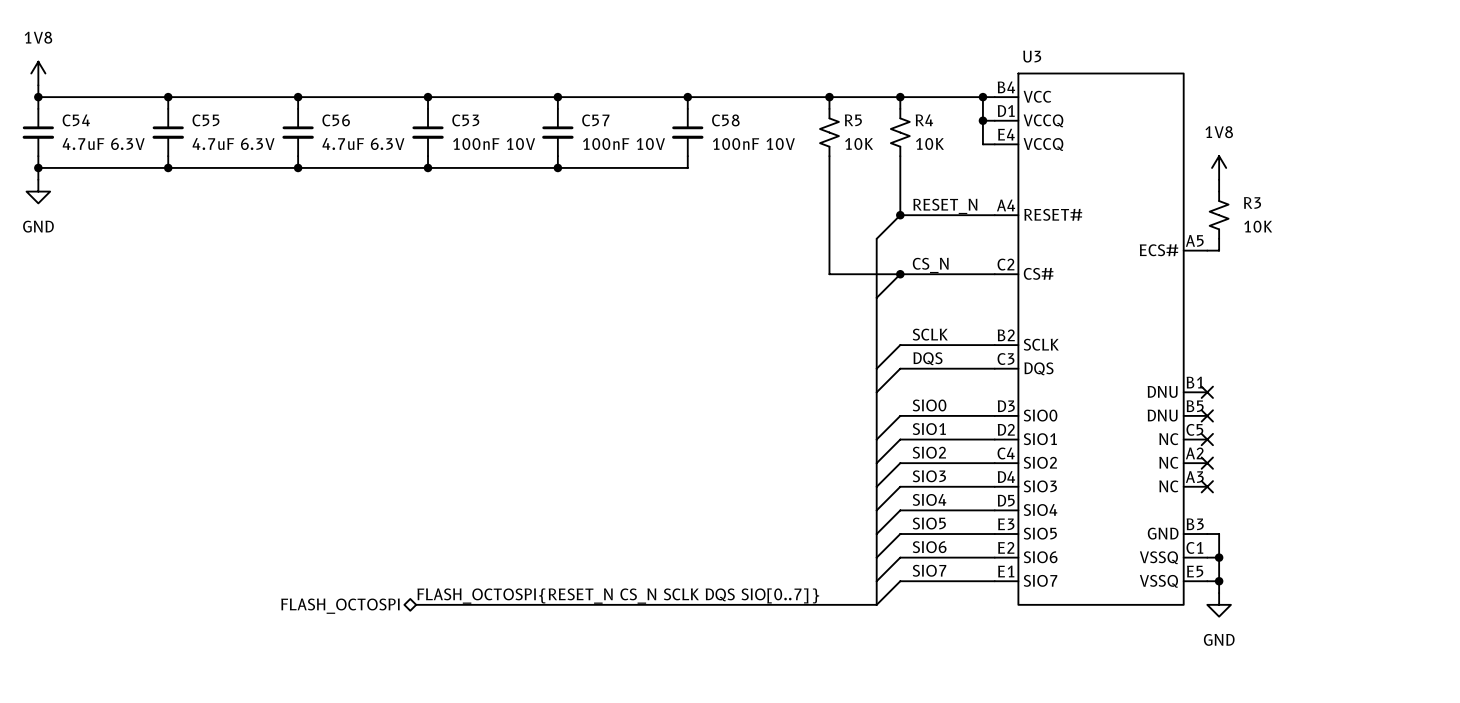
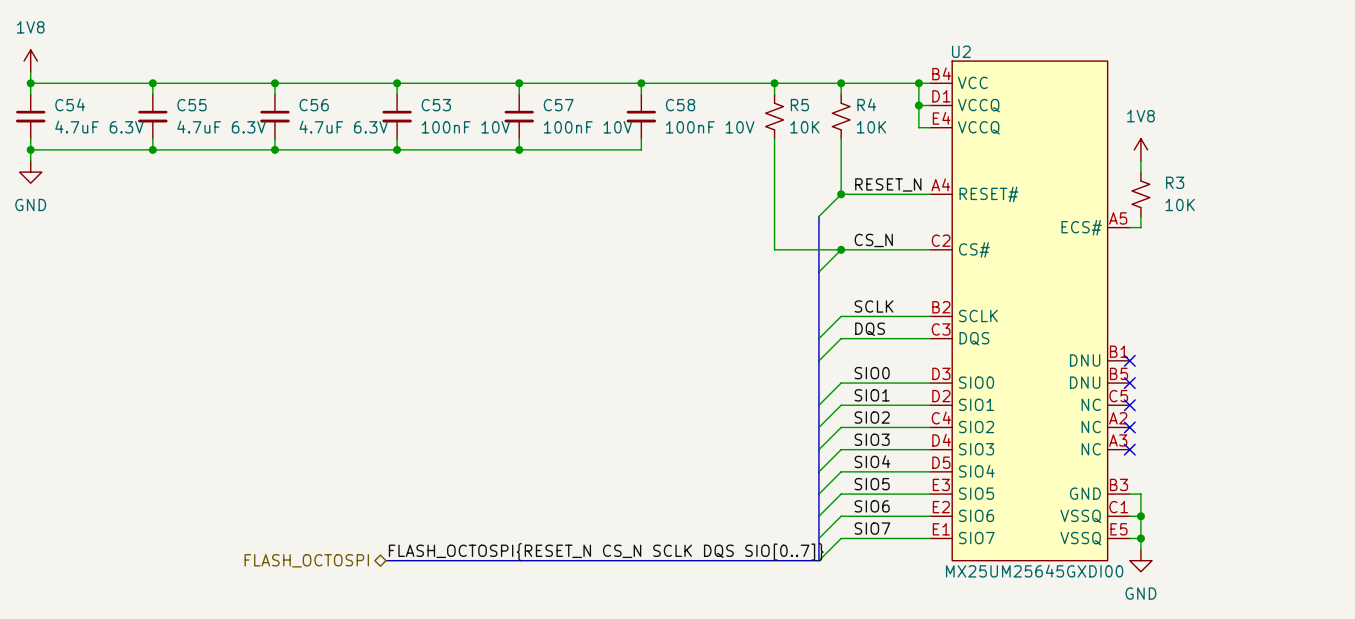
U3 name: U3 (1032, 56) -> U2 (961, 51)
U3 value: none -> MX25UM25645GXDI00 (1034, 571)

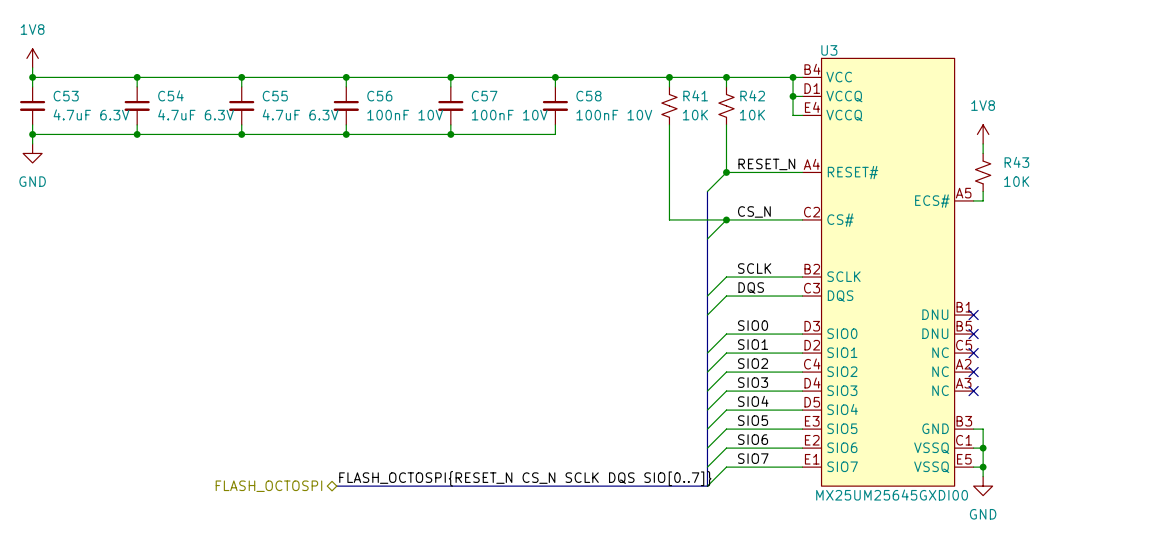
U2 name: U2 (961, 51) -> U3 (829, 50)
C54 name: C54 (70, 104) -> C53 (66, 96)
R4 name: R4 (866, 104) -> R42 (752, 95)
C55 name: C55 (192, 105) -> C54 (170, 95)
C56 name: C56 (314, 105) -> C55 (275, 96)
C53 name: C53 (436, 105) -> C56 (379, 96)
R5 name: R5 (799, 105) -> R41 (695, 95)
R3 name: R3 (1175, 182) -> R43 (1016, 162)

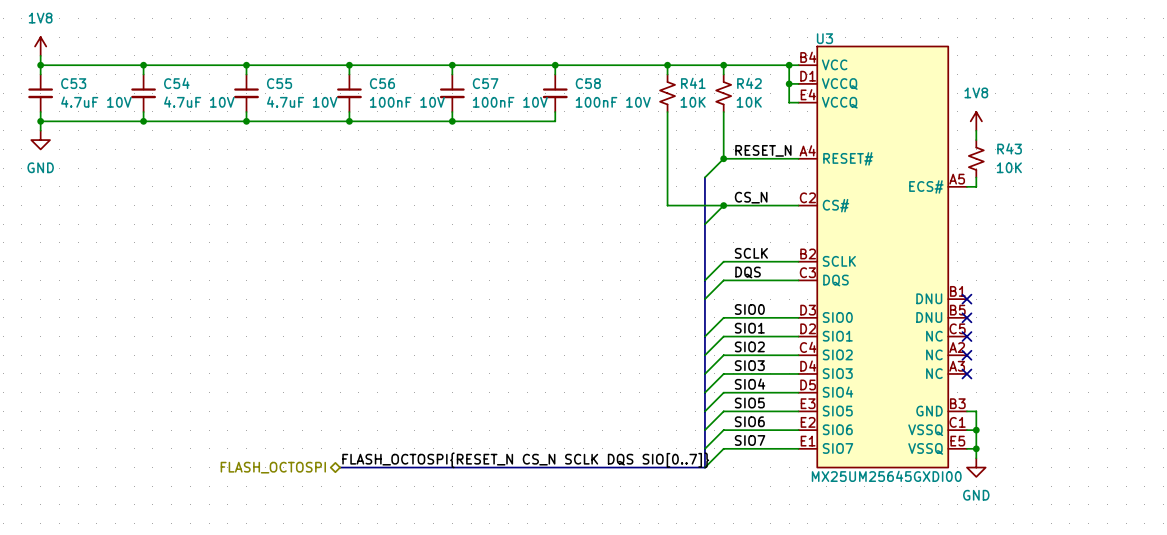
C53 value: 4.7uF 6.3V (91, 114) -> 4.7uF 10V (96, 102)
C54 value: 4.7uF 6.3V (196, 114) -> 4.7uF 10V (199, 102)
C55 value: 4.7uF 6.3V (300, 114) -> 4.7uF 10V (302, 102)

